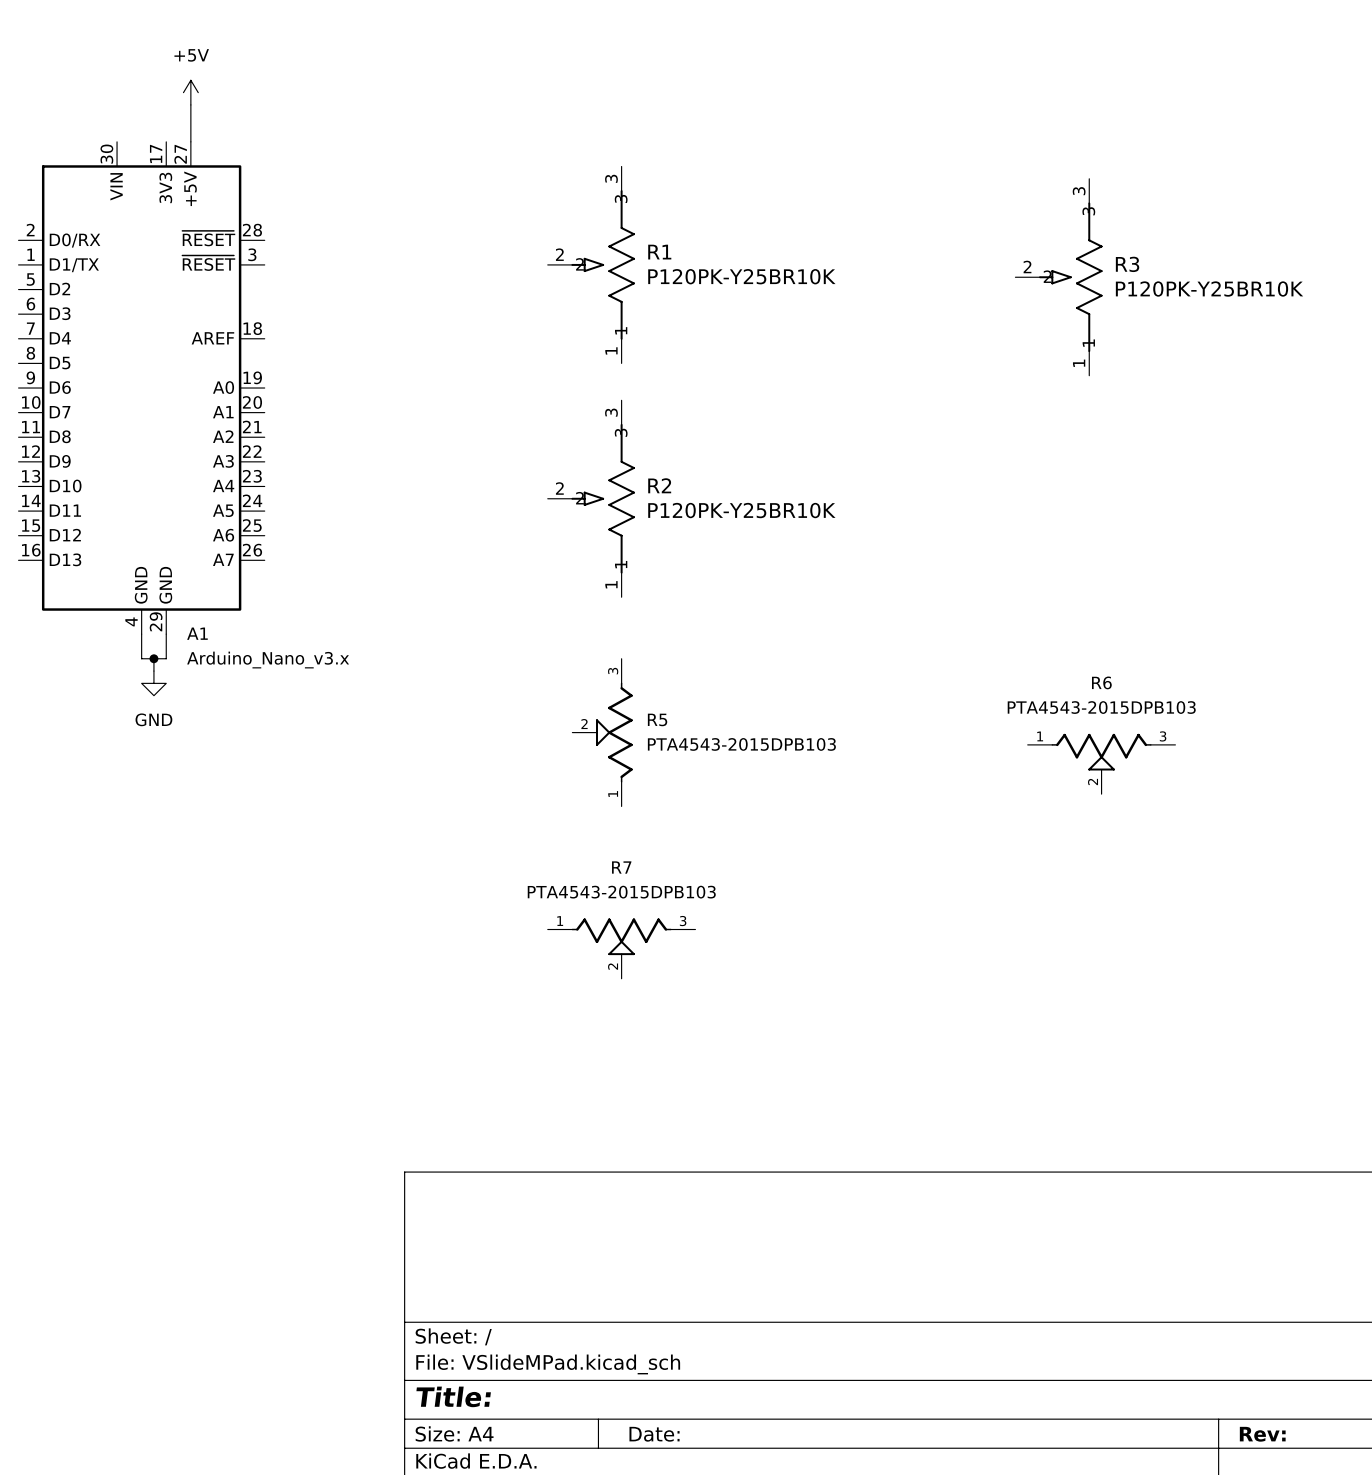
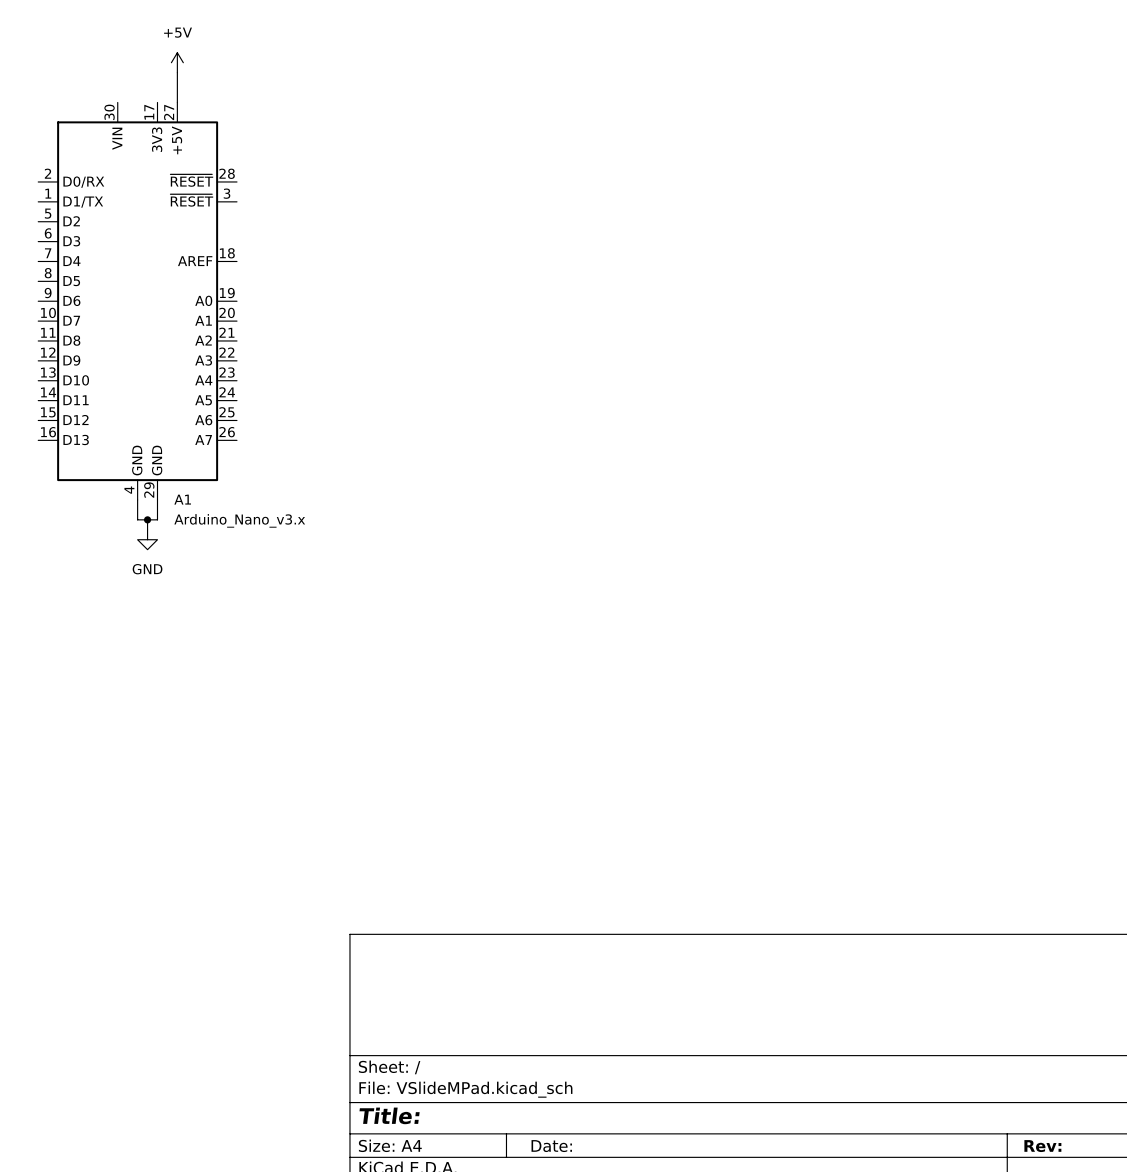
R1: P120PK-Y25BR10K (591, 264) -> none
R3: P120PK-Y25BR10K (1058, 277) -> none
R2: P120PK-Y25BR10K (591, 498) -> none
R5: PTA4543-2015DPB103 (602, 732) -> none
R6: PTA4543-2015DPB103 (1101, 763) -> none
R7: PTA4543-2015DPB103 (621, 948) -> none

